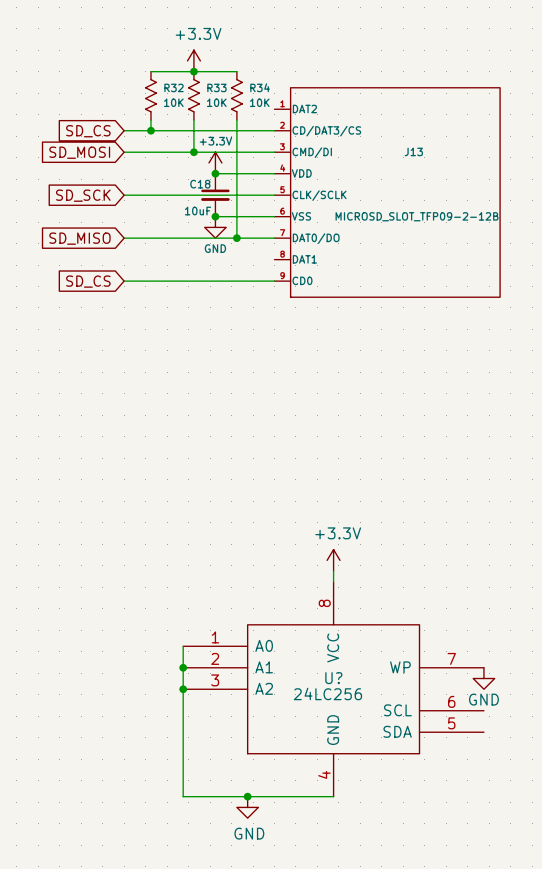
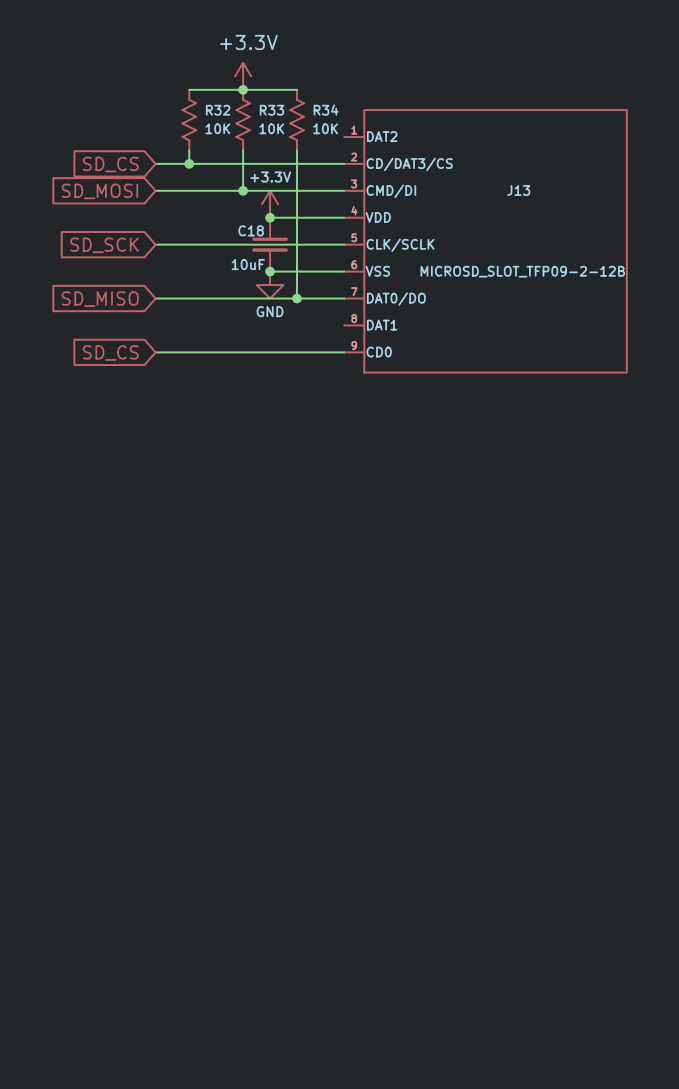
power symbol: +3.3V (333, 560) -> none
wire: (333, 571) (333, 581) -> none
wire: (183, 646) (183, 796) (333, 796) -> none
junction: (183, 667) -> none
power symbol: GND (483, 678) -> none
junction: (183, 689) -> none
U?: 24LC256 (333, 689) -> none
junction: (247, 796) -> none
power symbol: GND (247, 807) -> none

